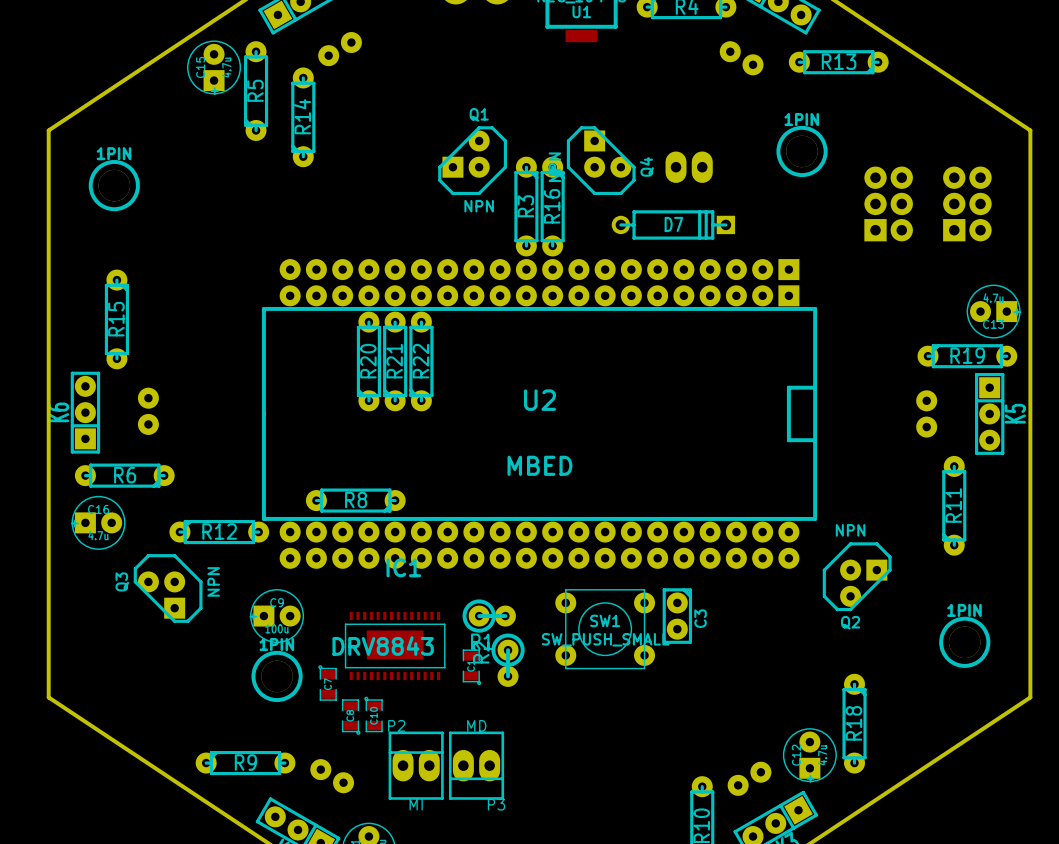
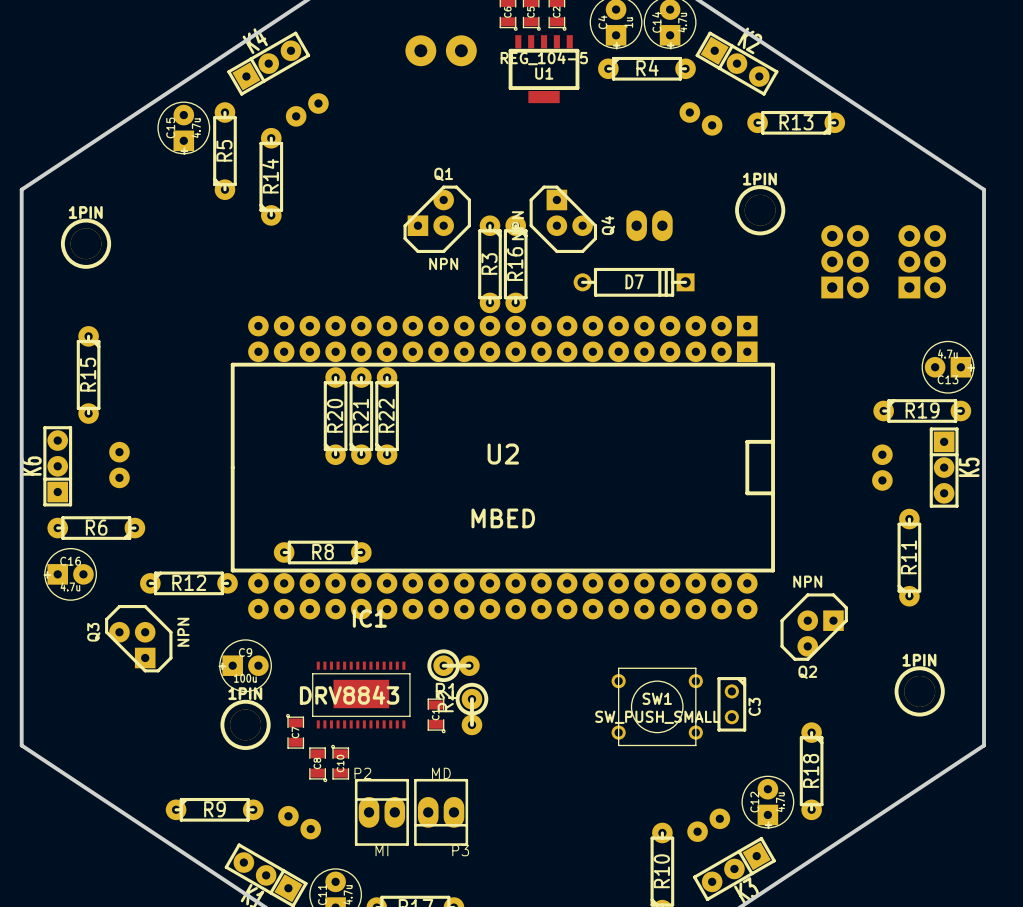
C3 footprint: [662, 588, 693, 644] -> [717, 677, 747, 732]
SW1 footprint: [555, 589, 656, 670] -> [611, 667, 703, 747]

